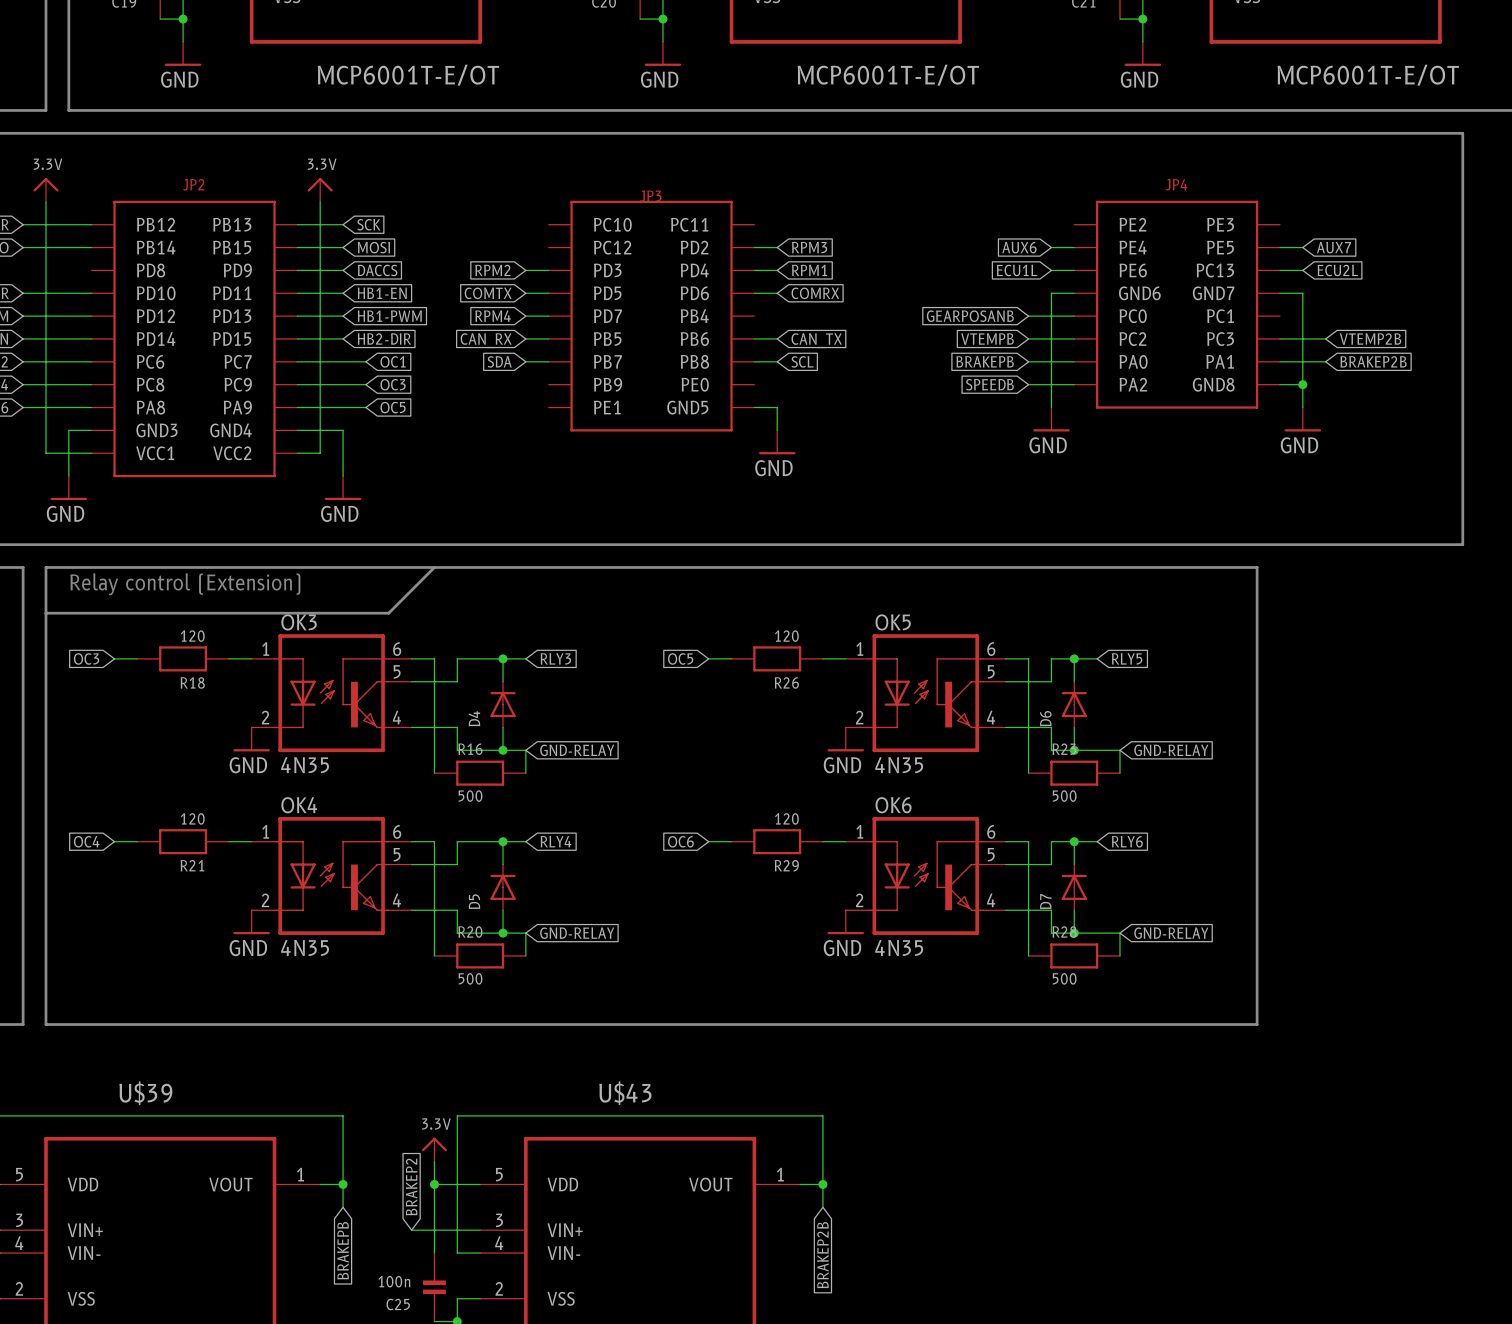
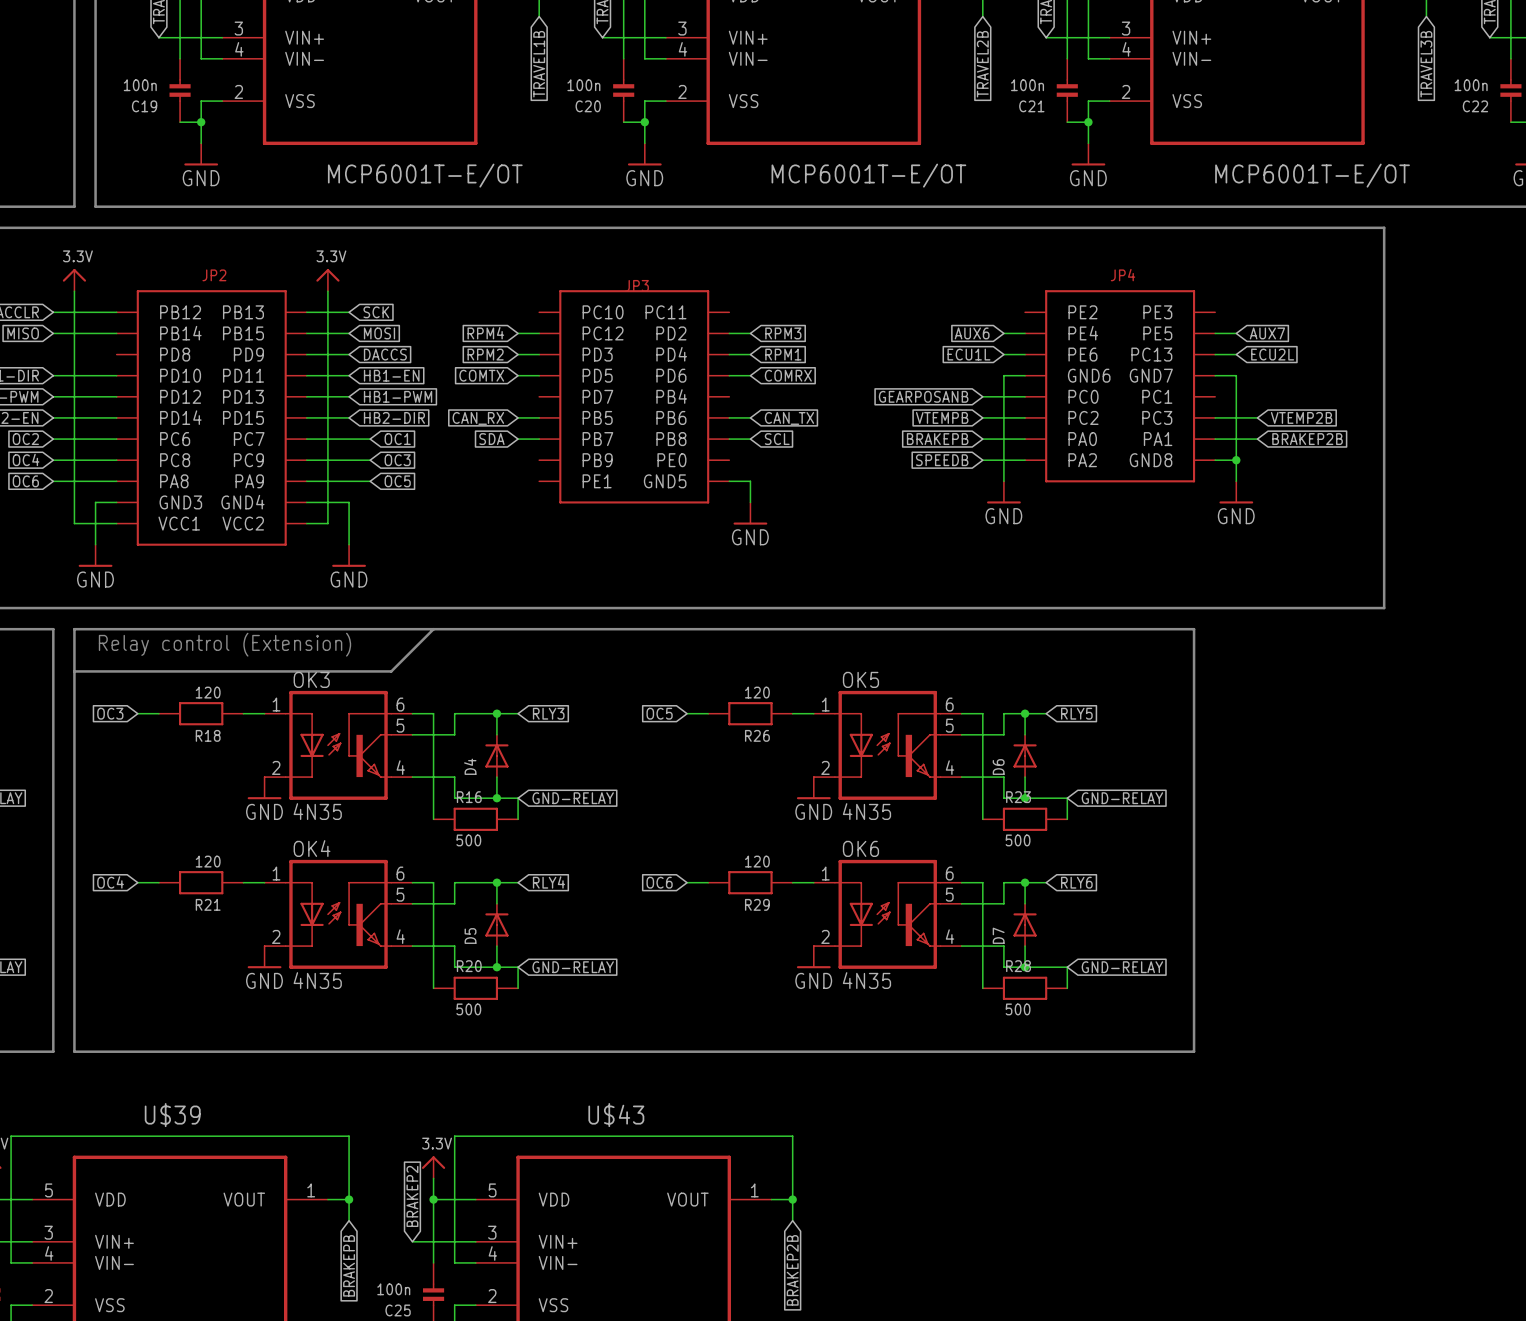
global label position: RPM4 (493, 316) -> RPM4 (485, 333)
wire: (525, 316) (548, 316) -> (518, 333) (539, 333)

